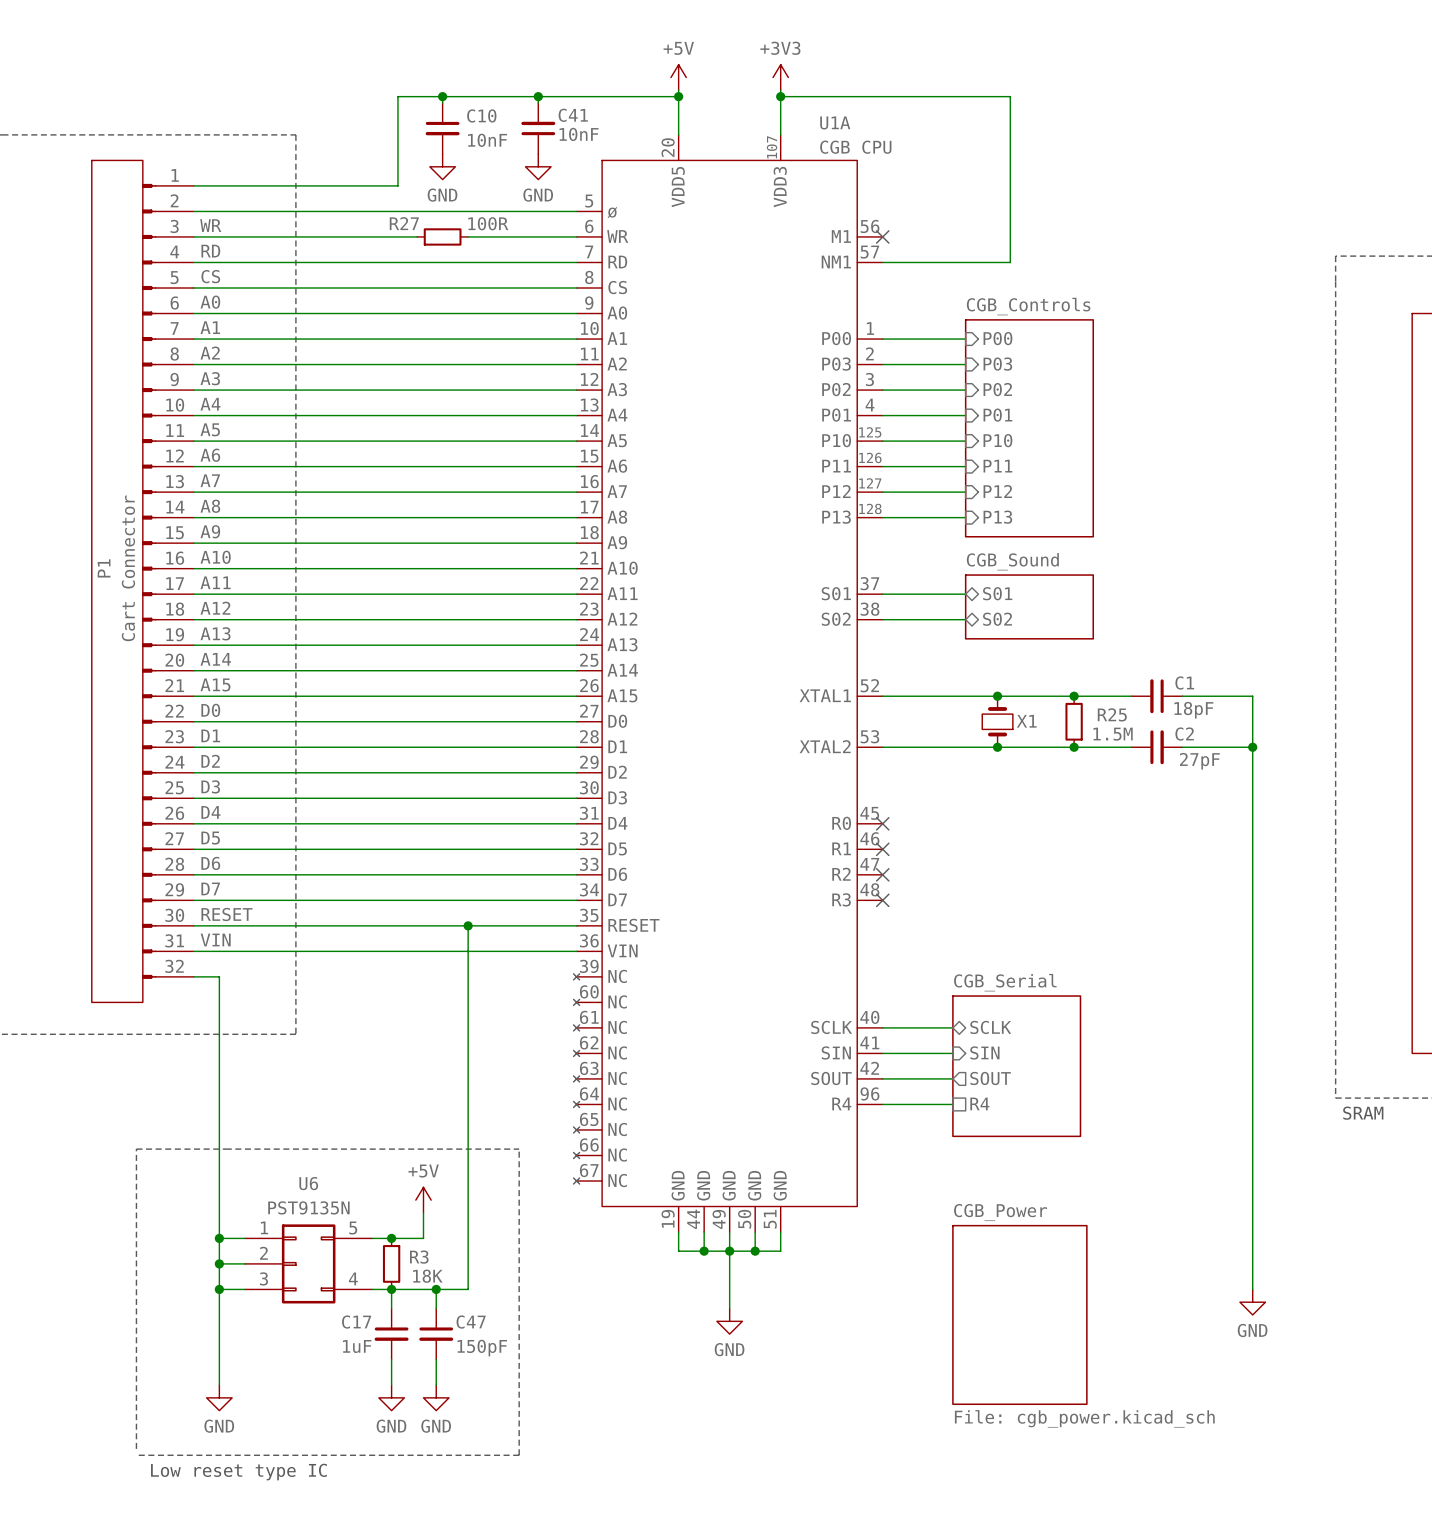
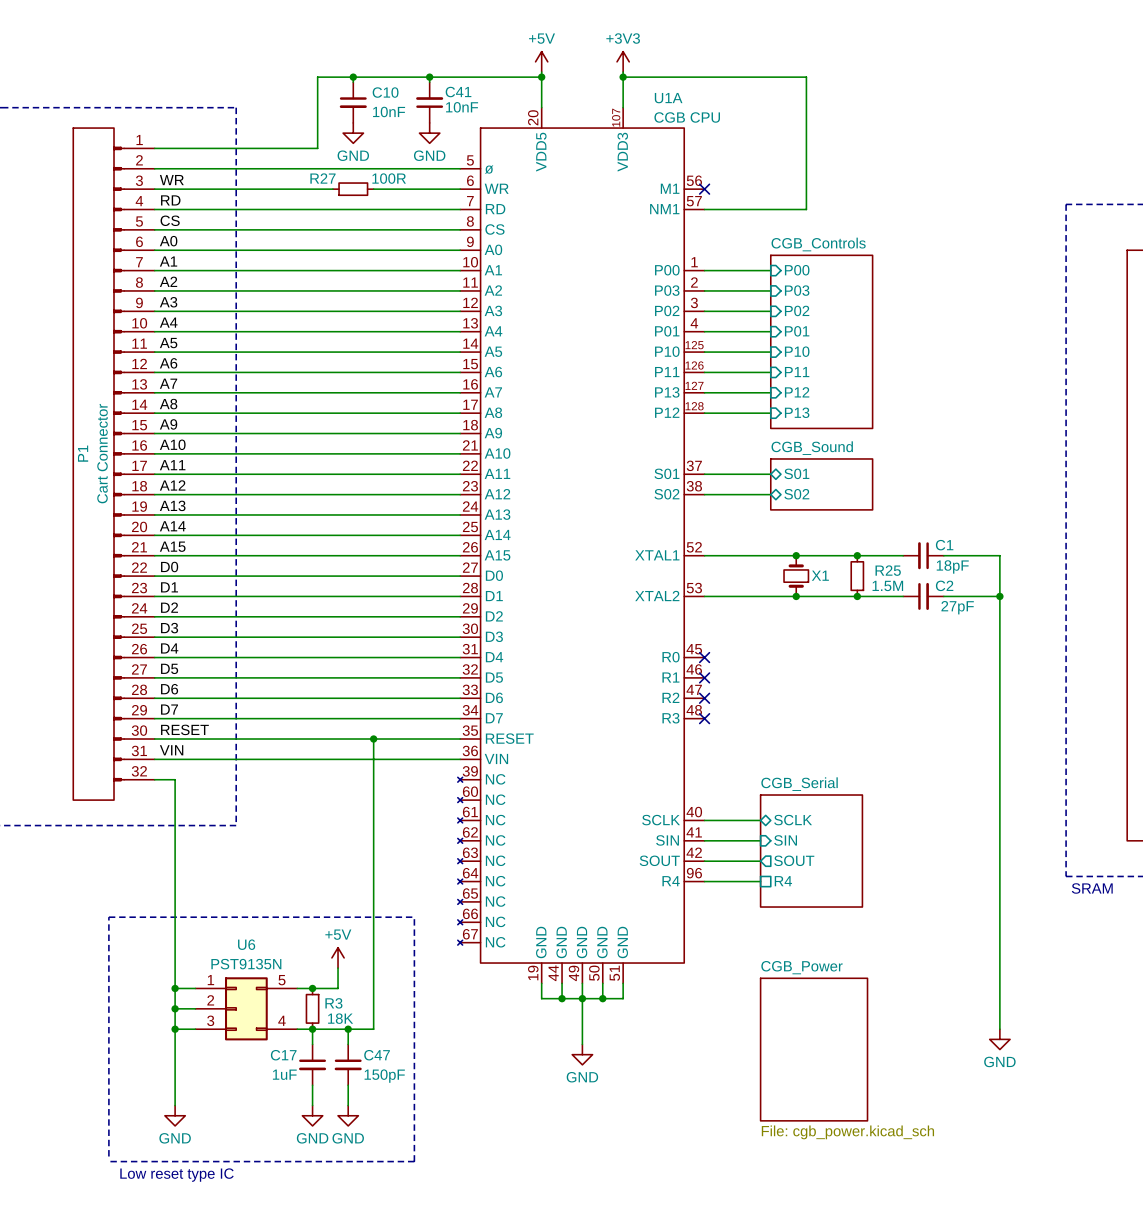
U1A pin name: P12 (836, 491) -> P13 (667, 392)
U1A pin name: P13 (836, 517) -> P12 (667, 412)

